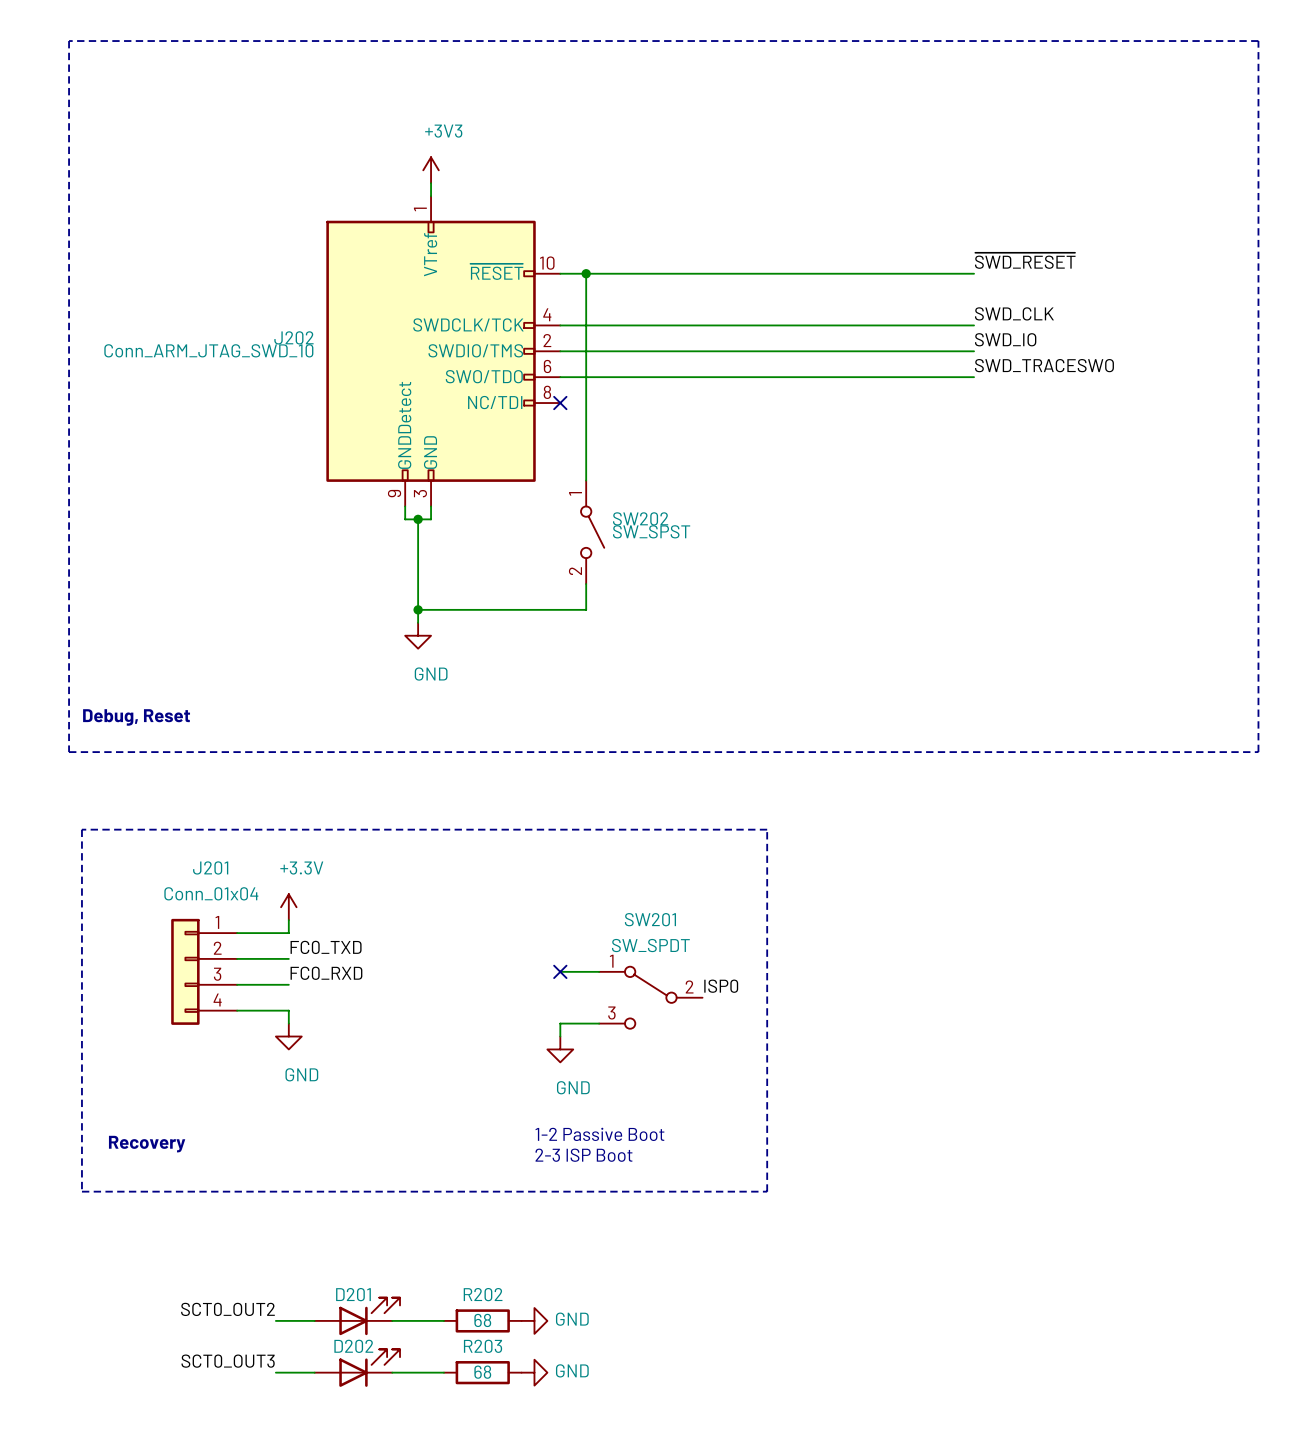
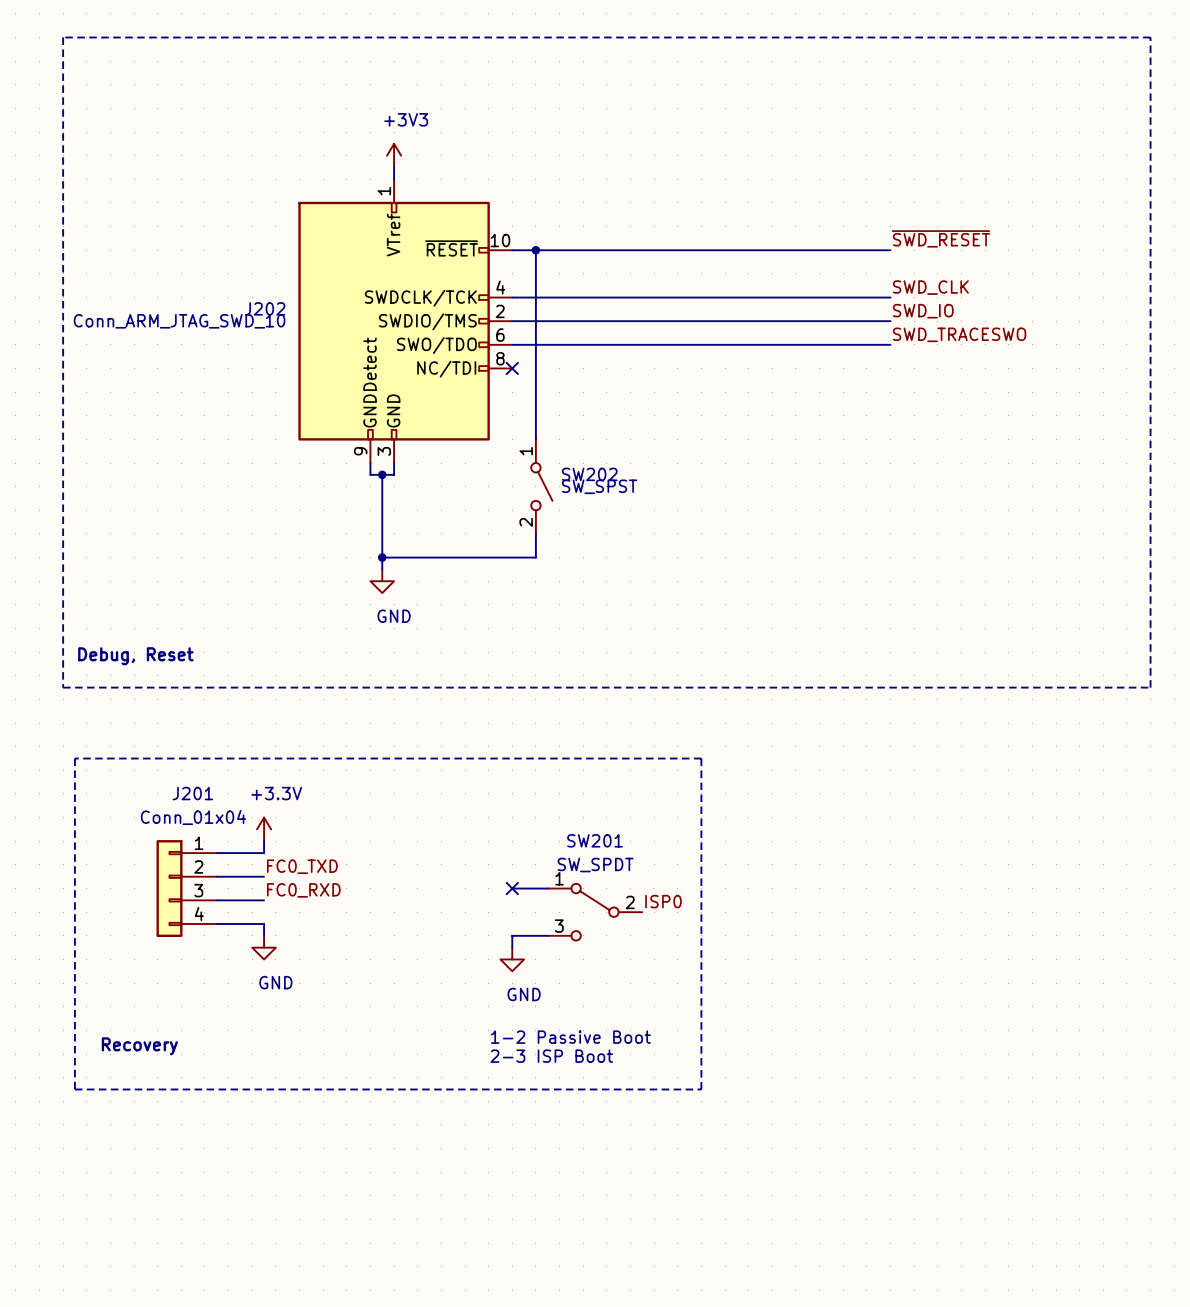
label: SCT0_OUT2 (227, 1309) -> none
D201: (357, 1316) -> none
wire: (275, 1320) (314, 1320) -> none
wire: (392, 1320) (443, 1320) -> none
R202: 68 (482, 1320) -> none
power symbol: GND (534, 1320) -> none
label: SCT0_OUT3 (228, 1361) -> none
D202: (357, 1368) -> none
wire: (275, 1372) (314, 1372) -> none
wire: (392, 1372) (443, 1372) -> none
R203: 68 (482, 1372) -> none
power symbol: GND (534, 1372) -> none

